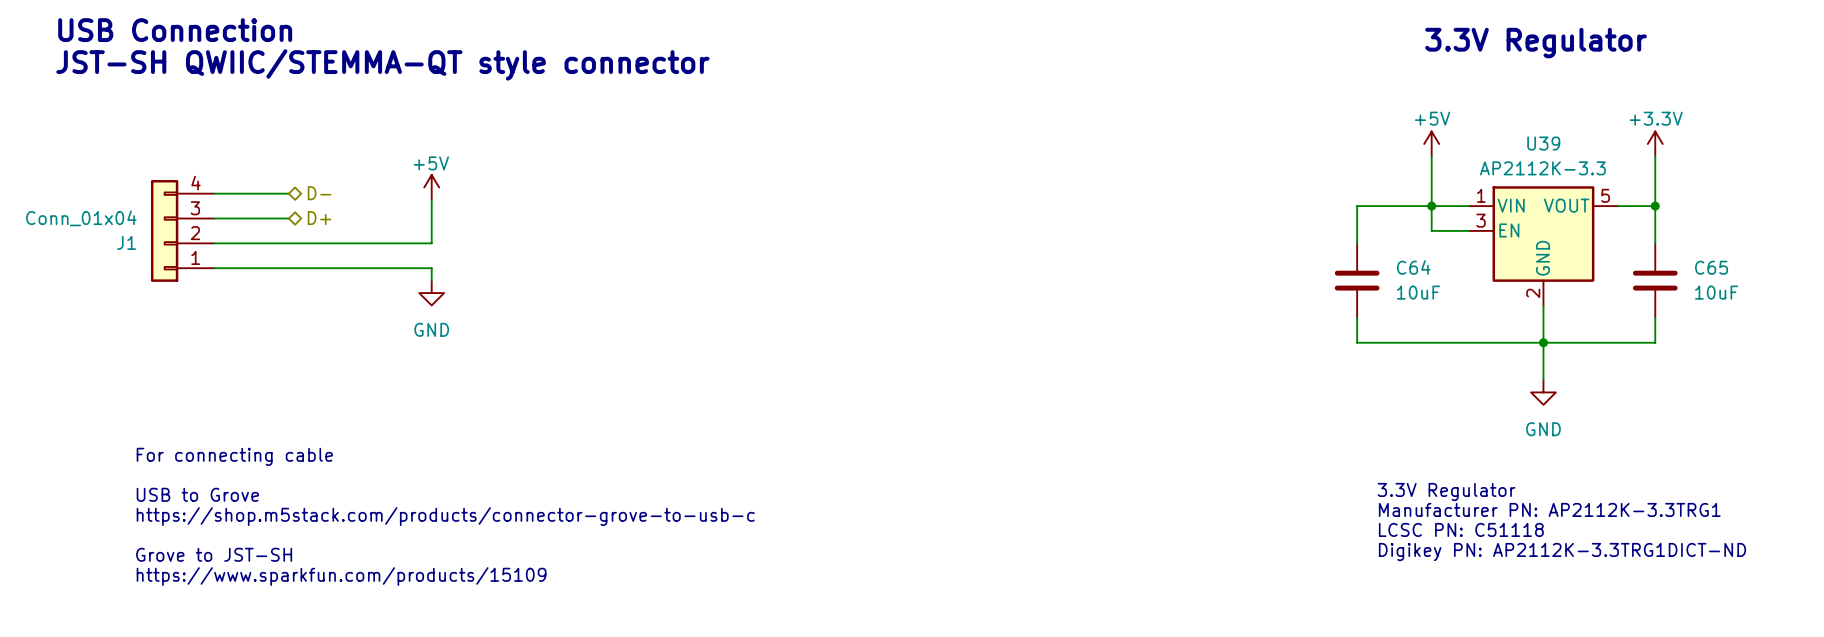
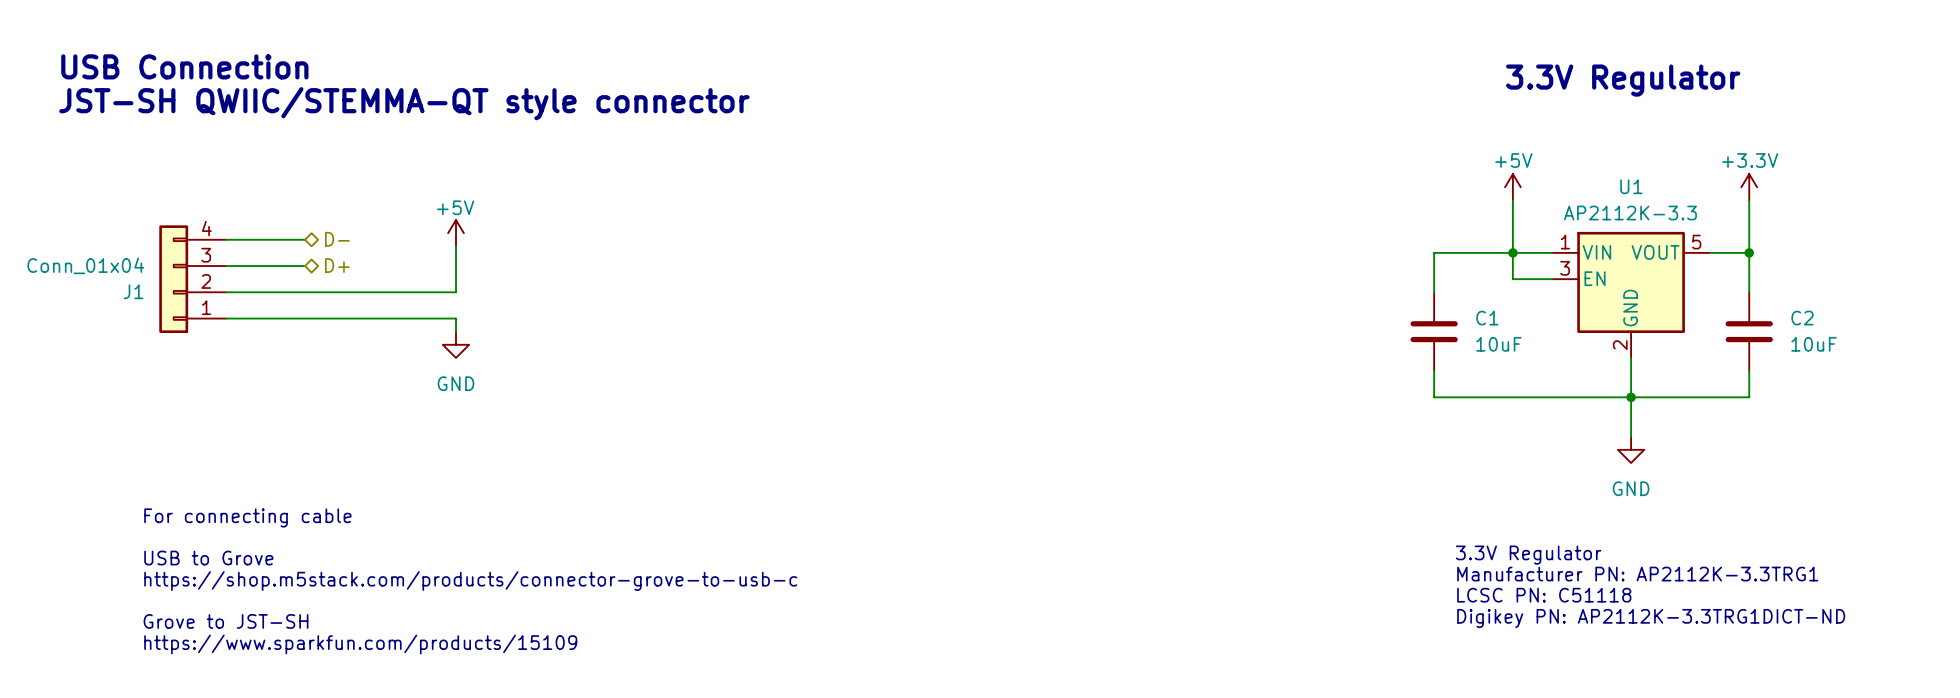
U39 name: U39 (1543, 143) -> U1 (1631, 186)
C64 name: C64 (1413, 267) -> C1 (1487, 318)
C65 name: C65 (1711, 267) -> C2 (1802, 318)

